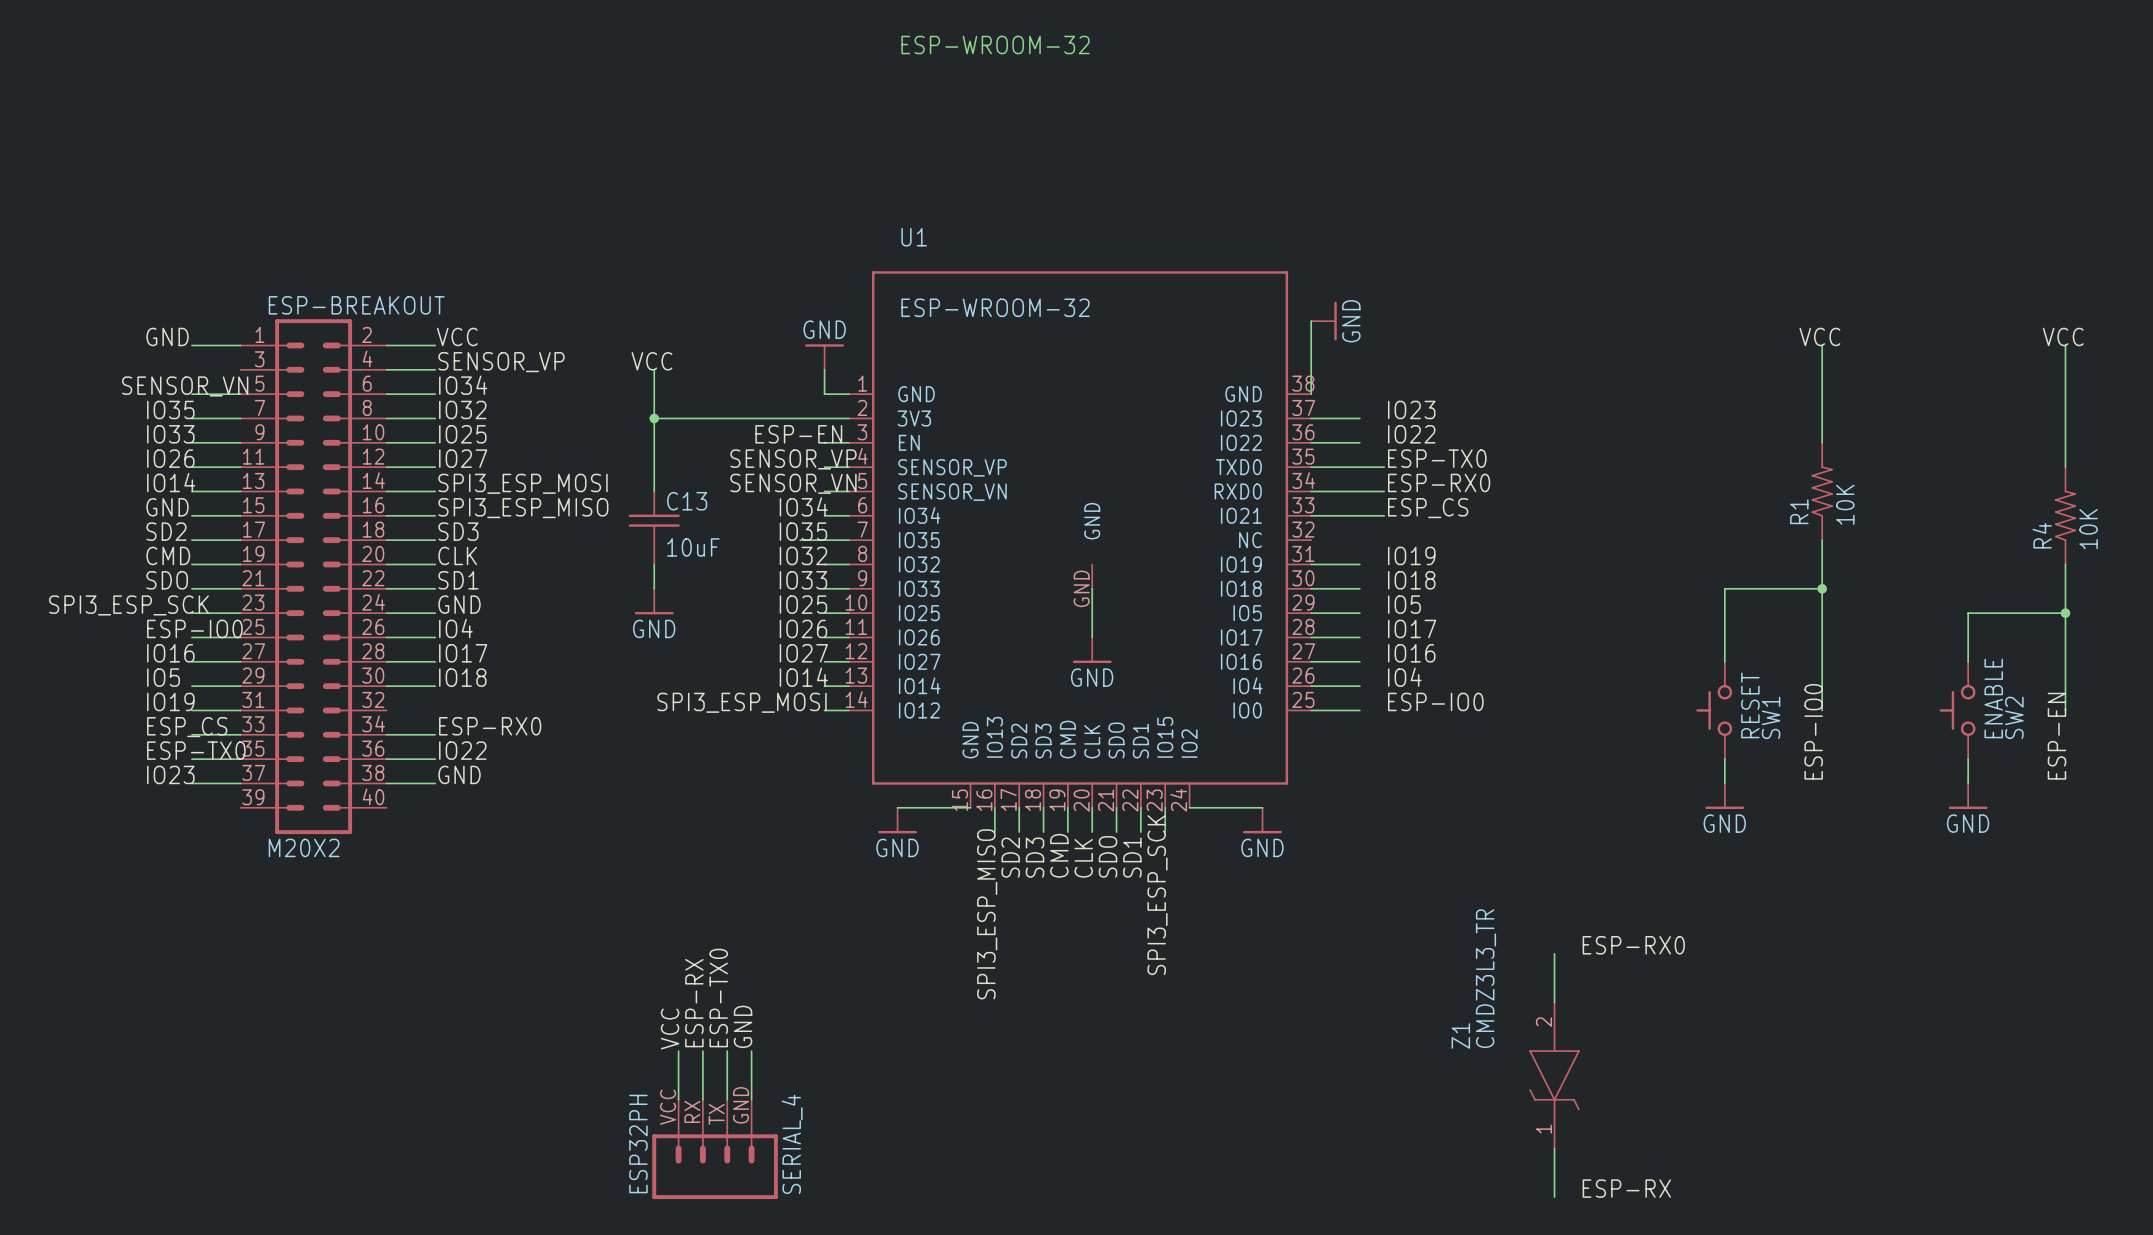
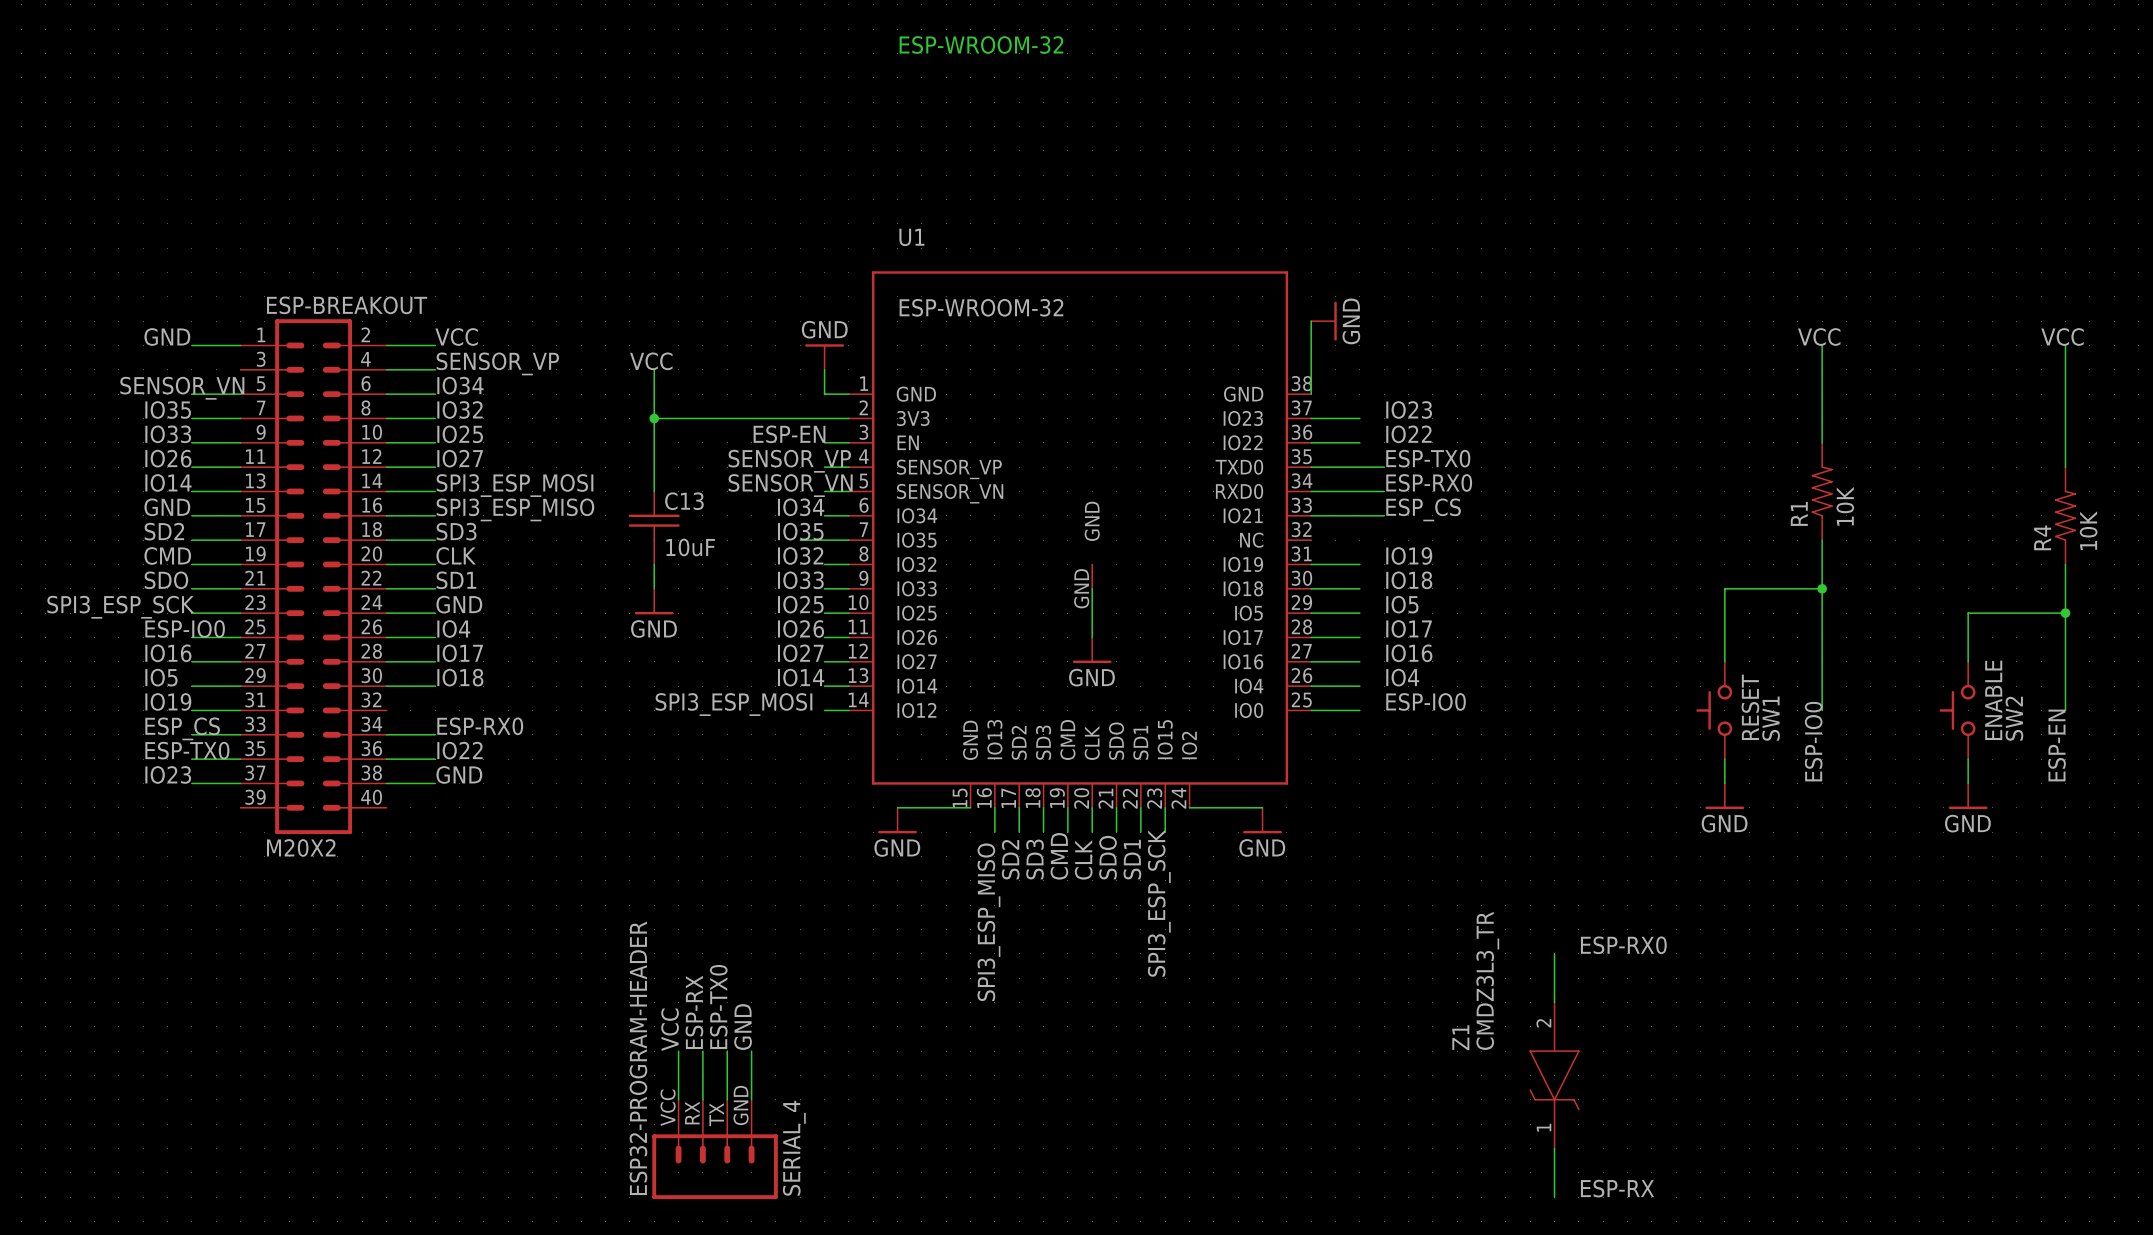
ESP32PH name: ESP32PH (638, 1144) -> ESP32-PROGRAM-HEADER (638, 1058)

